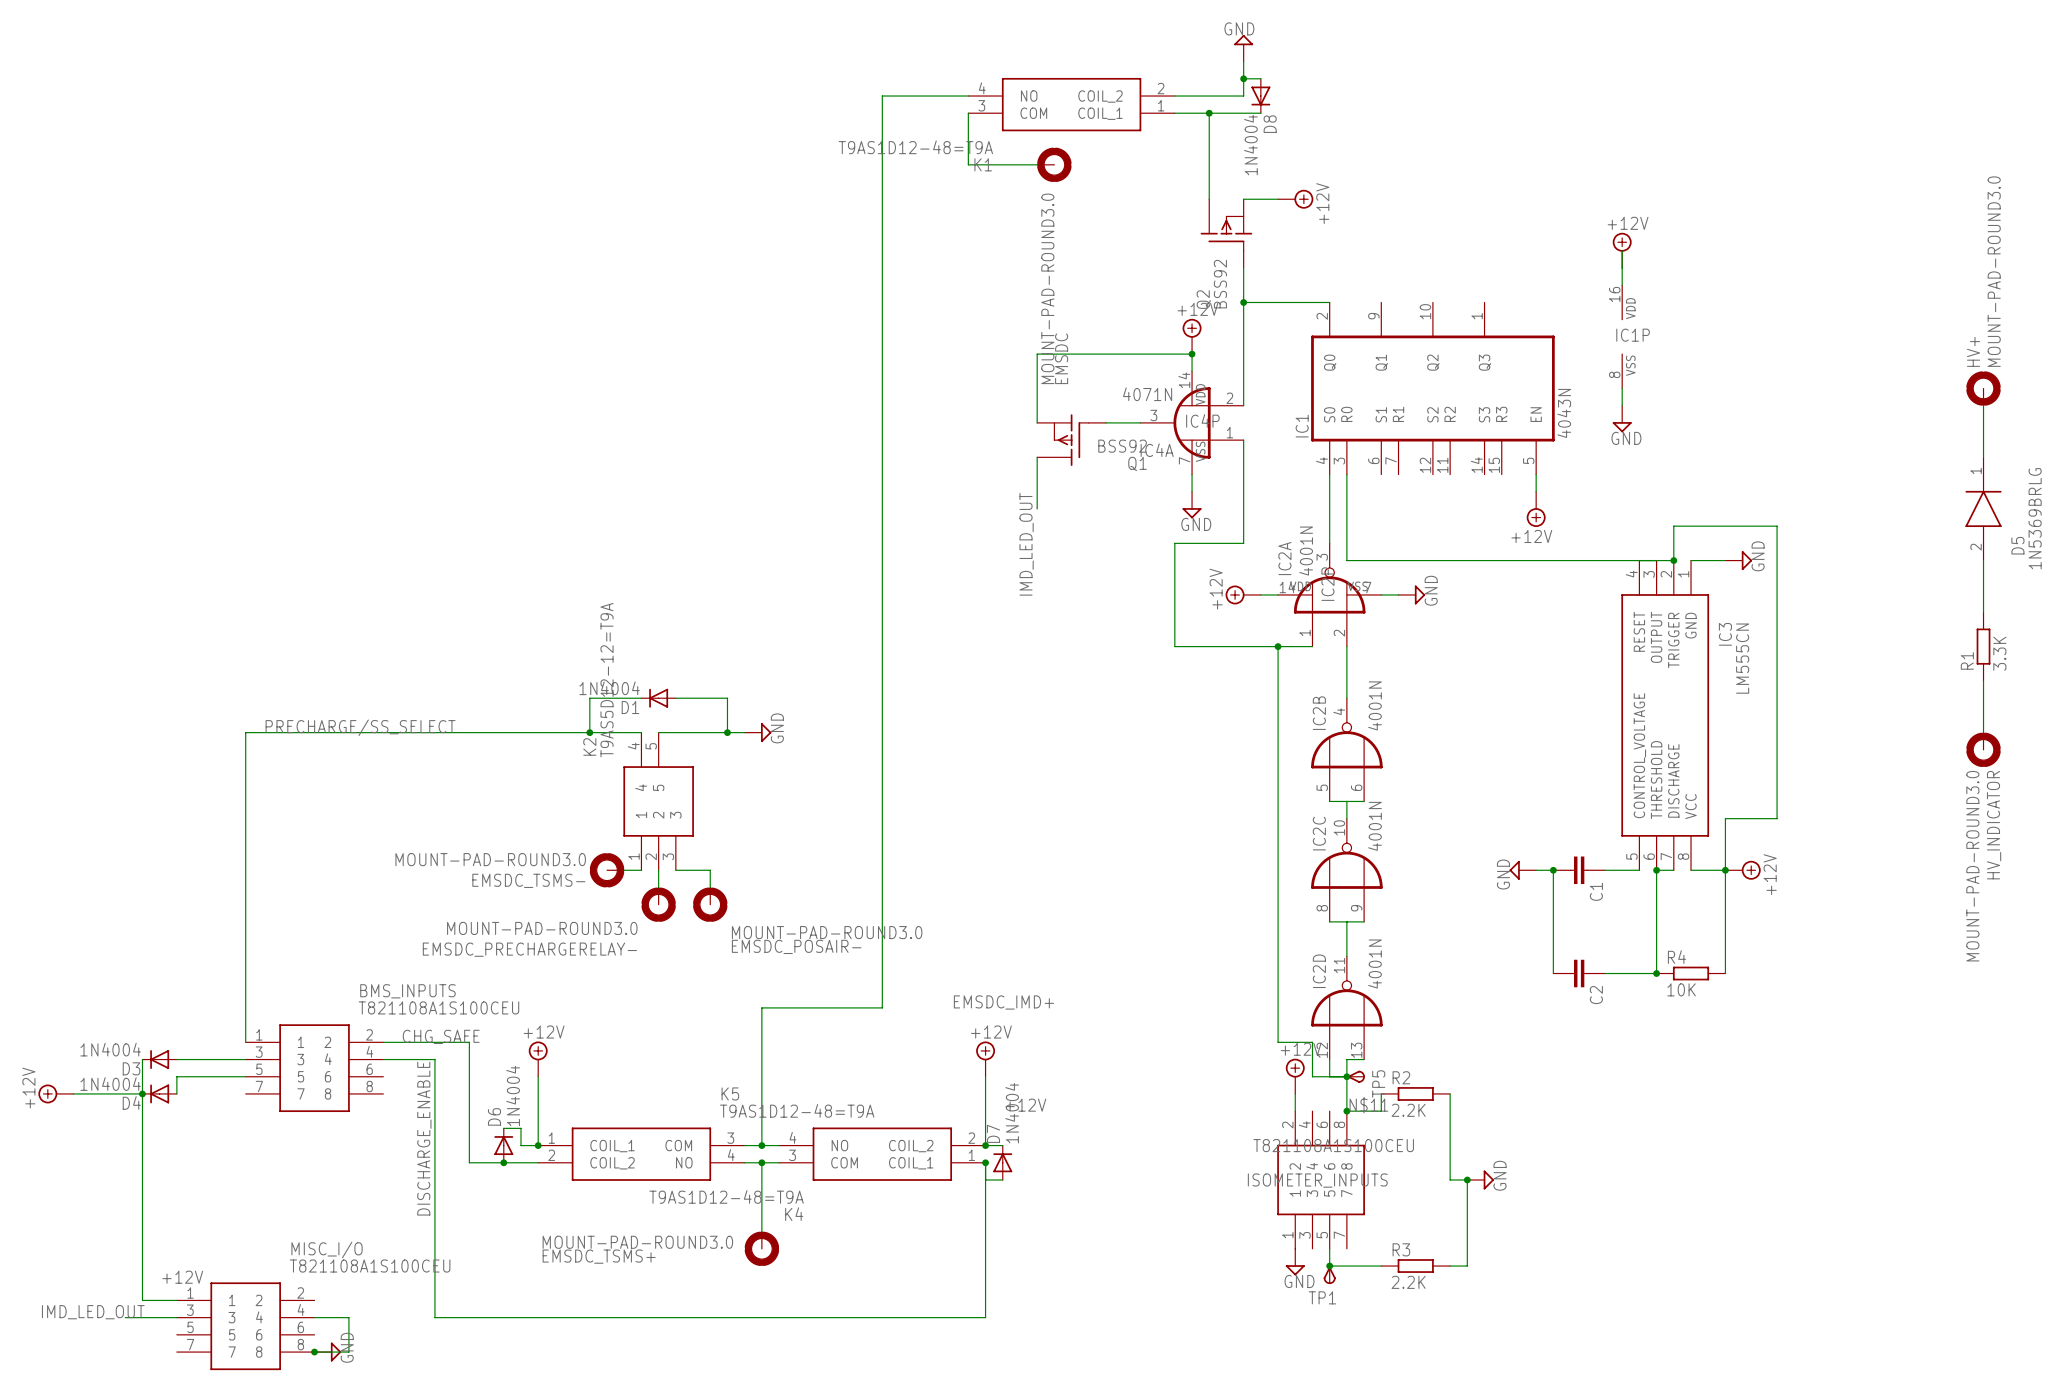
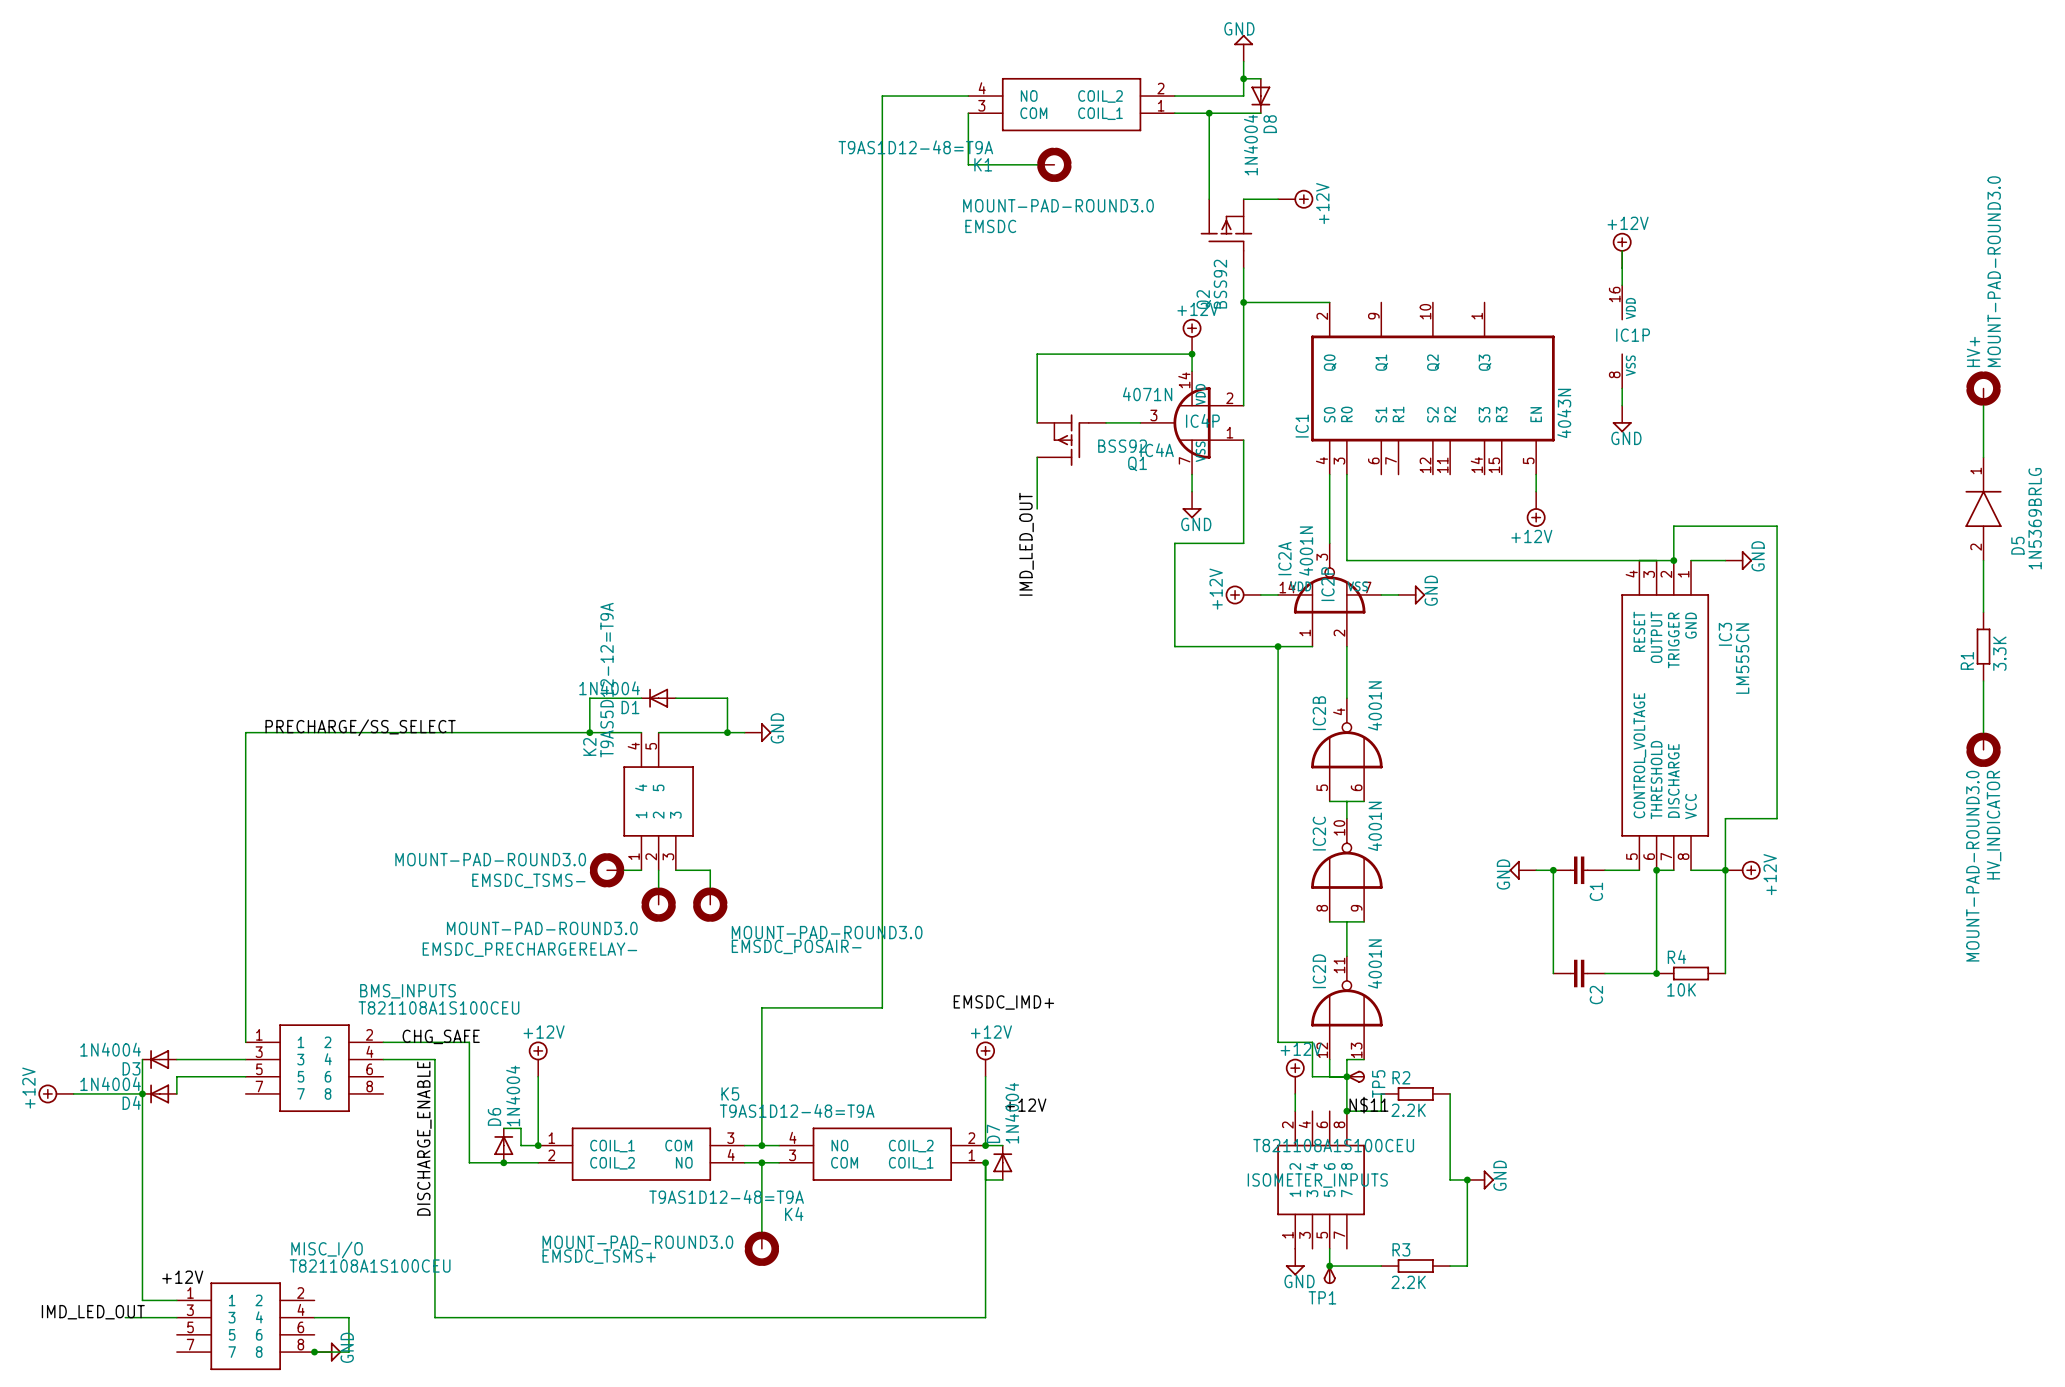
EMSDC value rotation: 0° (1047, 288) -> 90° clockwise (1058, 205)
EMSDC name rotation: 0° (1061, 358) -> 90° clockwise (990, 226)
EMSDC name position: EMSDC (1061, 358) -> EMSDC (990, 226)

